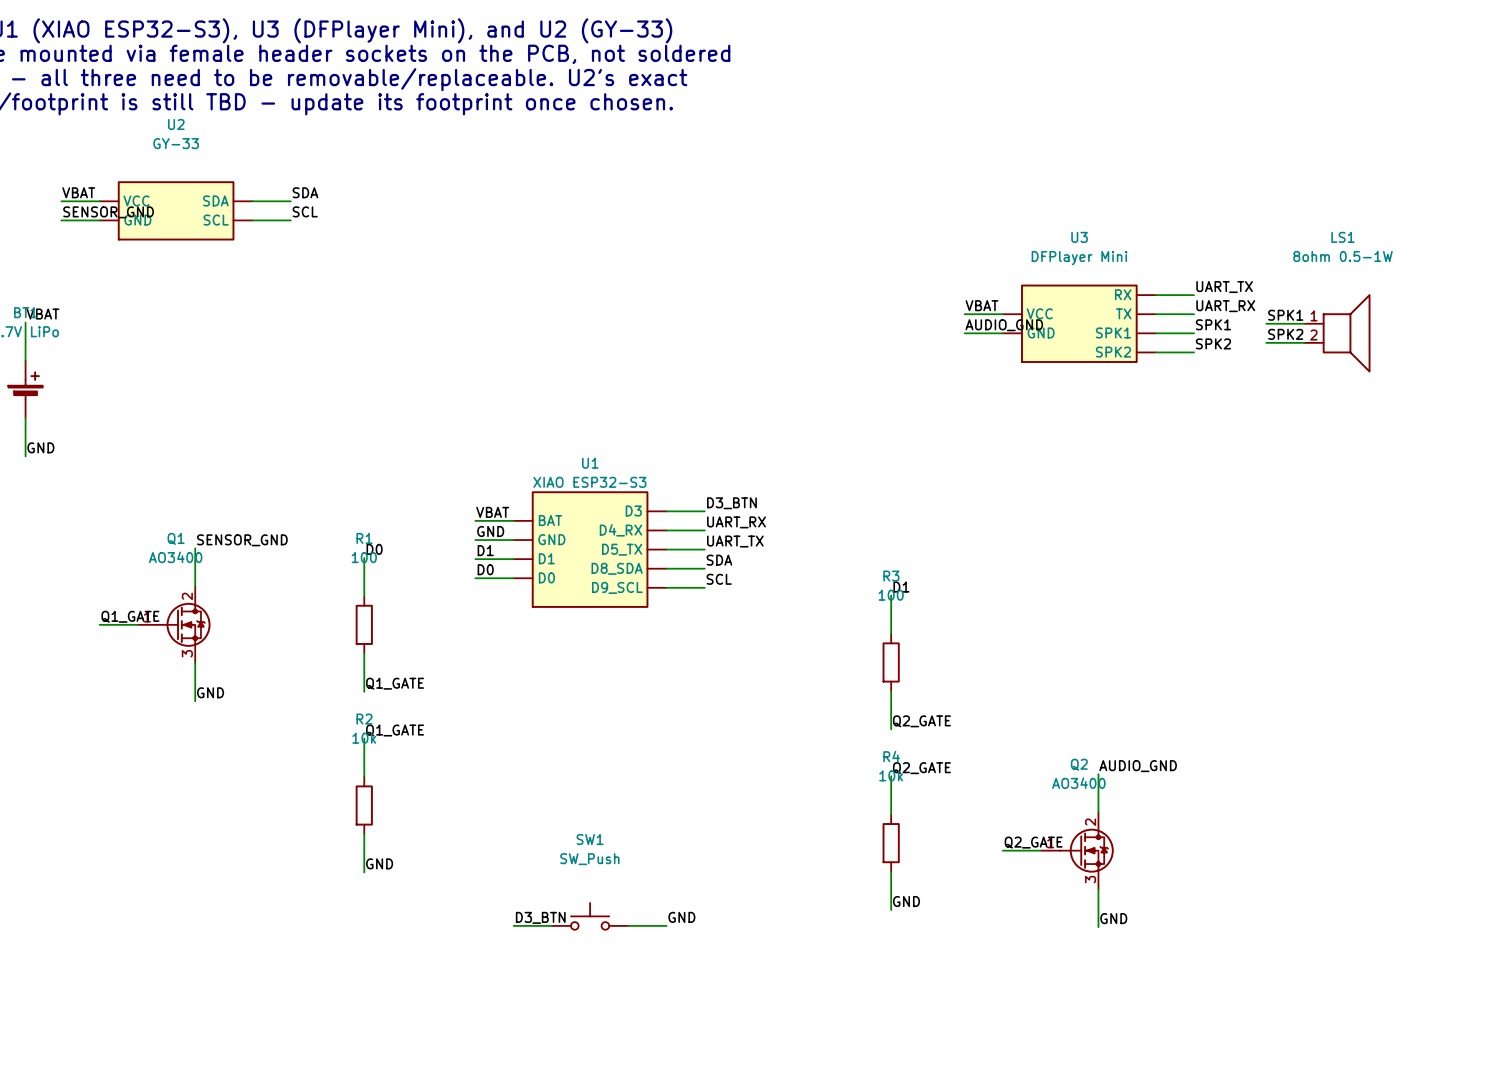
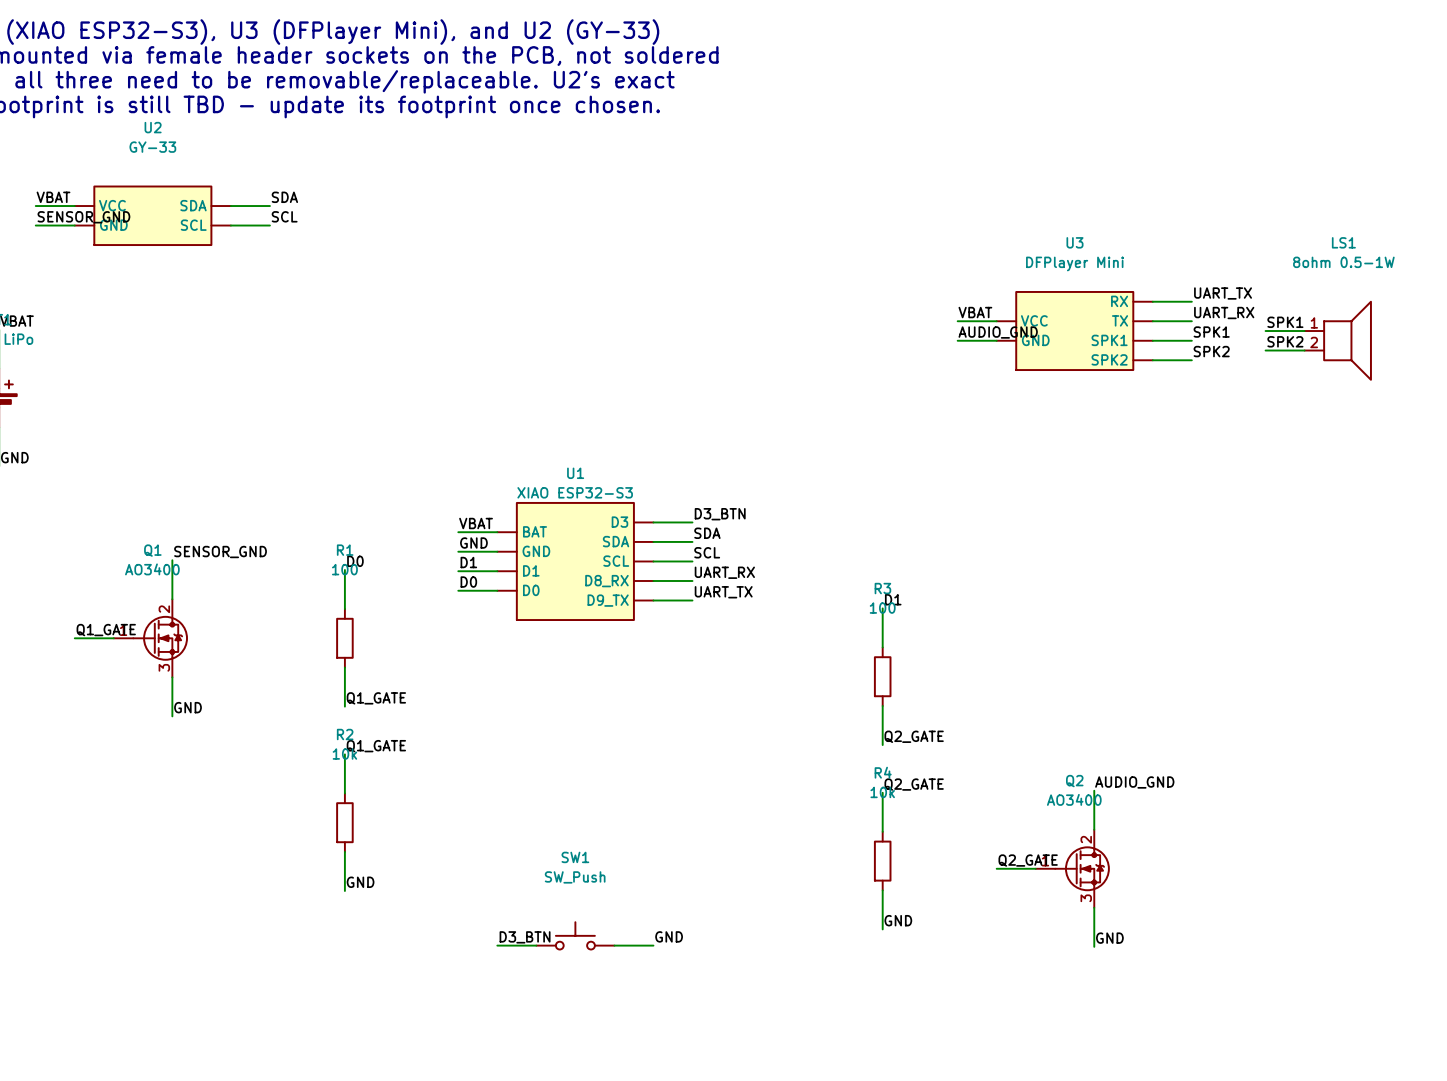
label: UART_RX (736, 522) -> SDA (707, 533)
U1 pin name: D4_RX (621, 530) -> SDA (616, 541)
label: UART_TX (735, 541) -> SCL (707, 552)
U1 pin name: D5_TX (622, 549) -> SCL (616, 561)
label: SDA (719, 560) -> UART_RX (724, 572)
U1 pin name: D8_SDA (617, 568) -> D8_RX (606, 581)
label: SCL (719, 579) -> UART_TX (723, 592)
U1 pin name: D9_SCL (617, 587) -> D9_TX (608, 600)

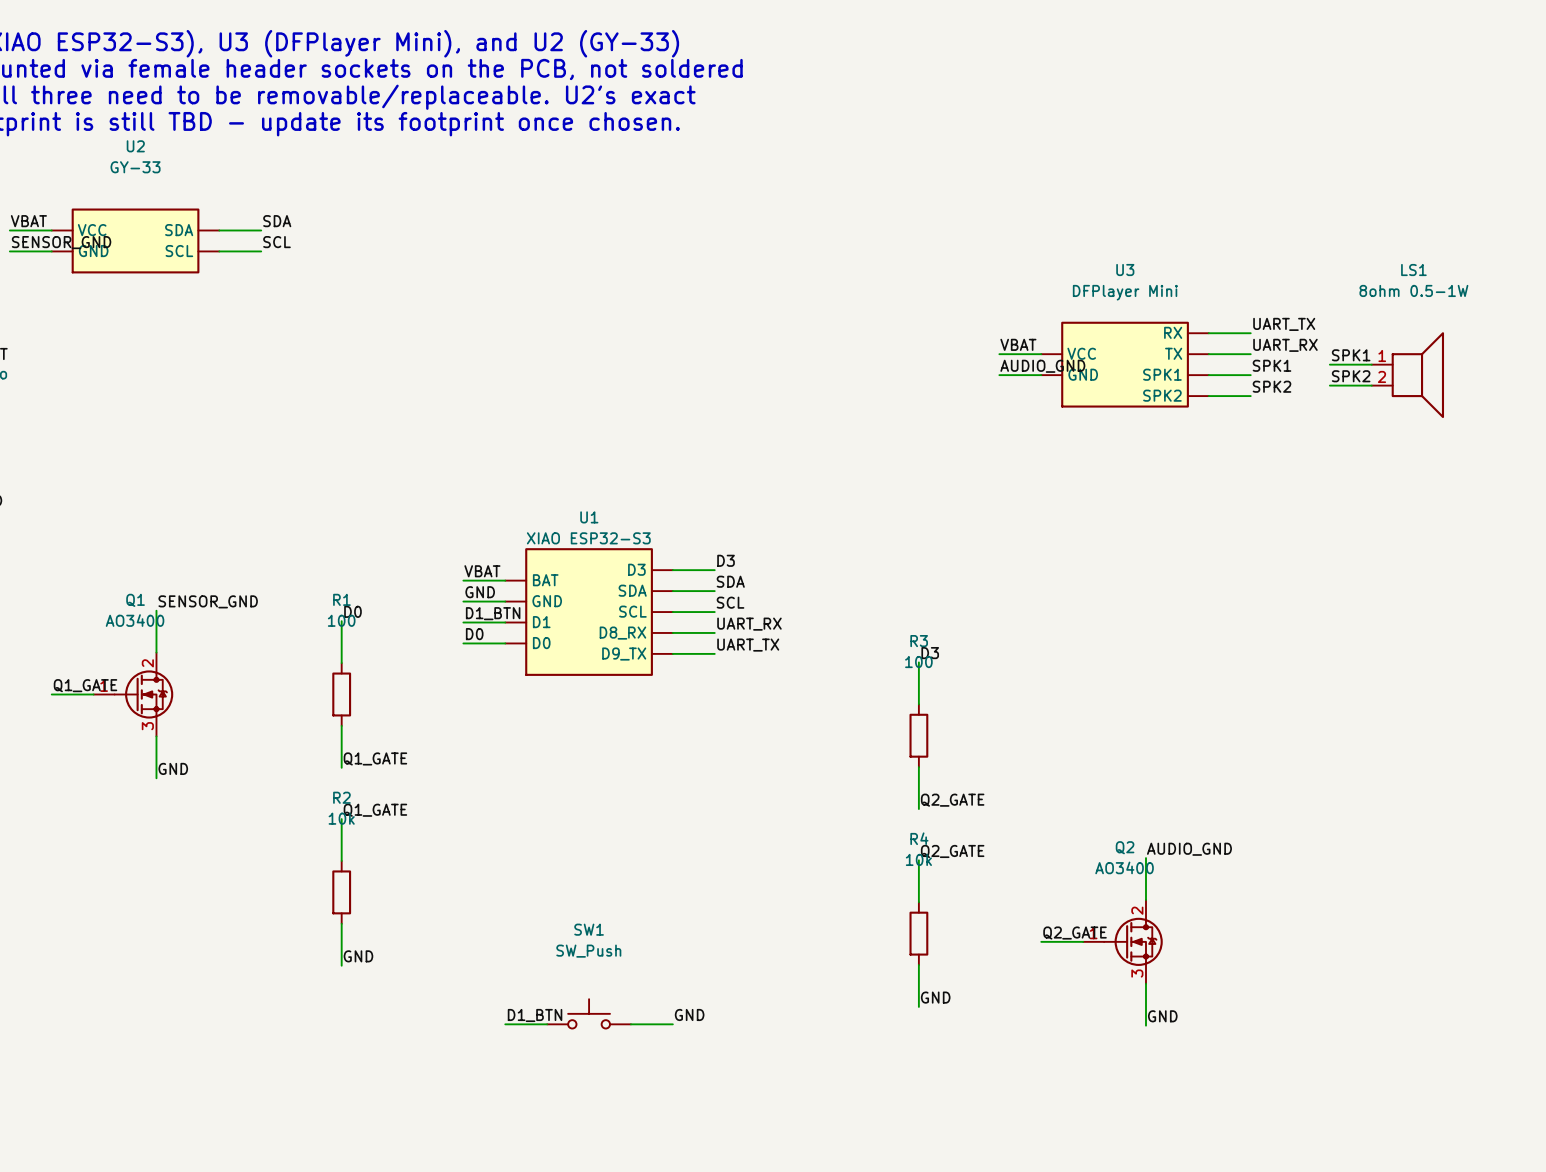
label: D3_BTN (720, 514) -> D3 (726, 560)
label: D1 (468, 562) -> D1_BTN (493, 613)
label: D1 (893, 599) -> D3 (930, 653)
label: D3_BTN (525, 937) -> D1_BTN (535, 1015)

